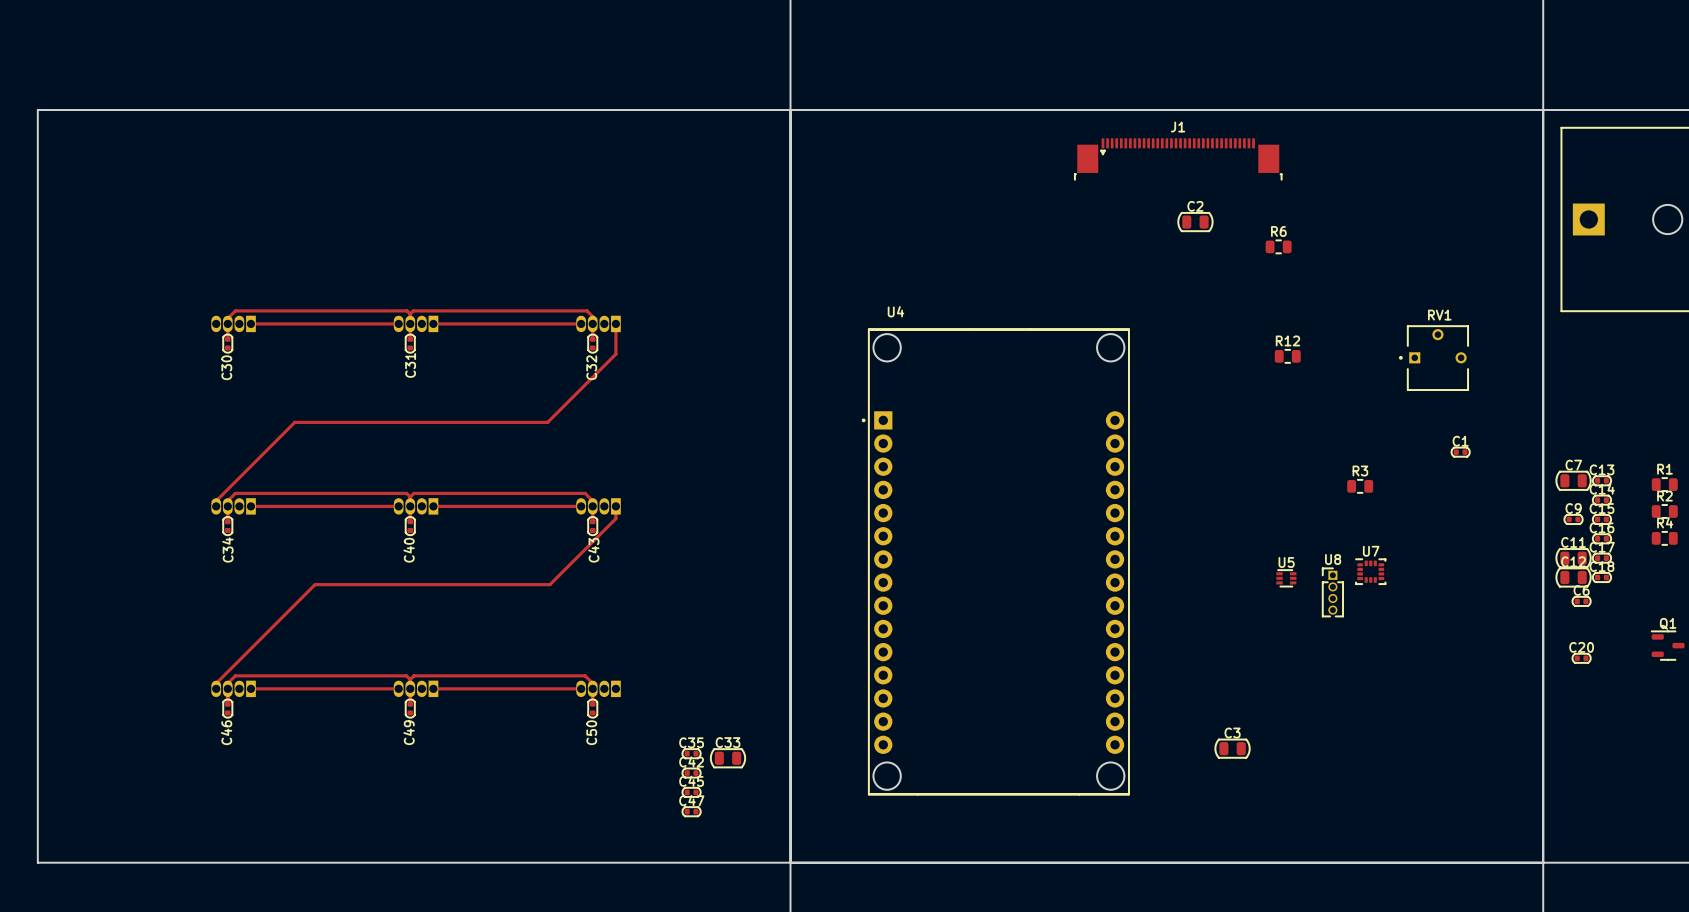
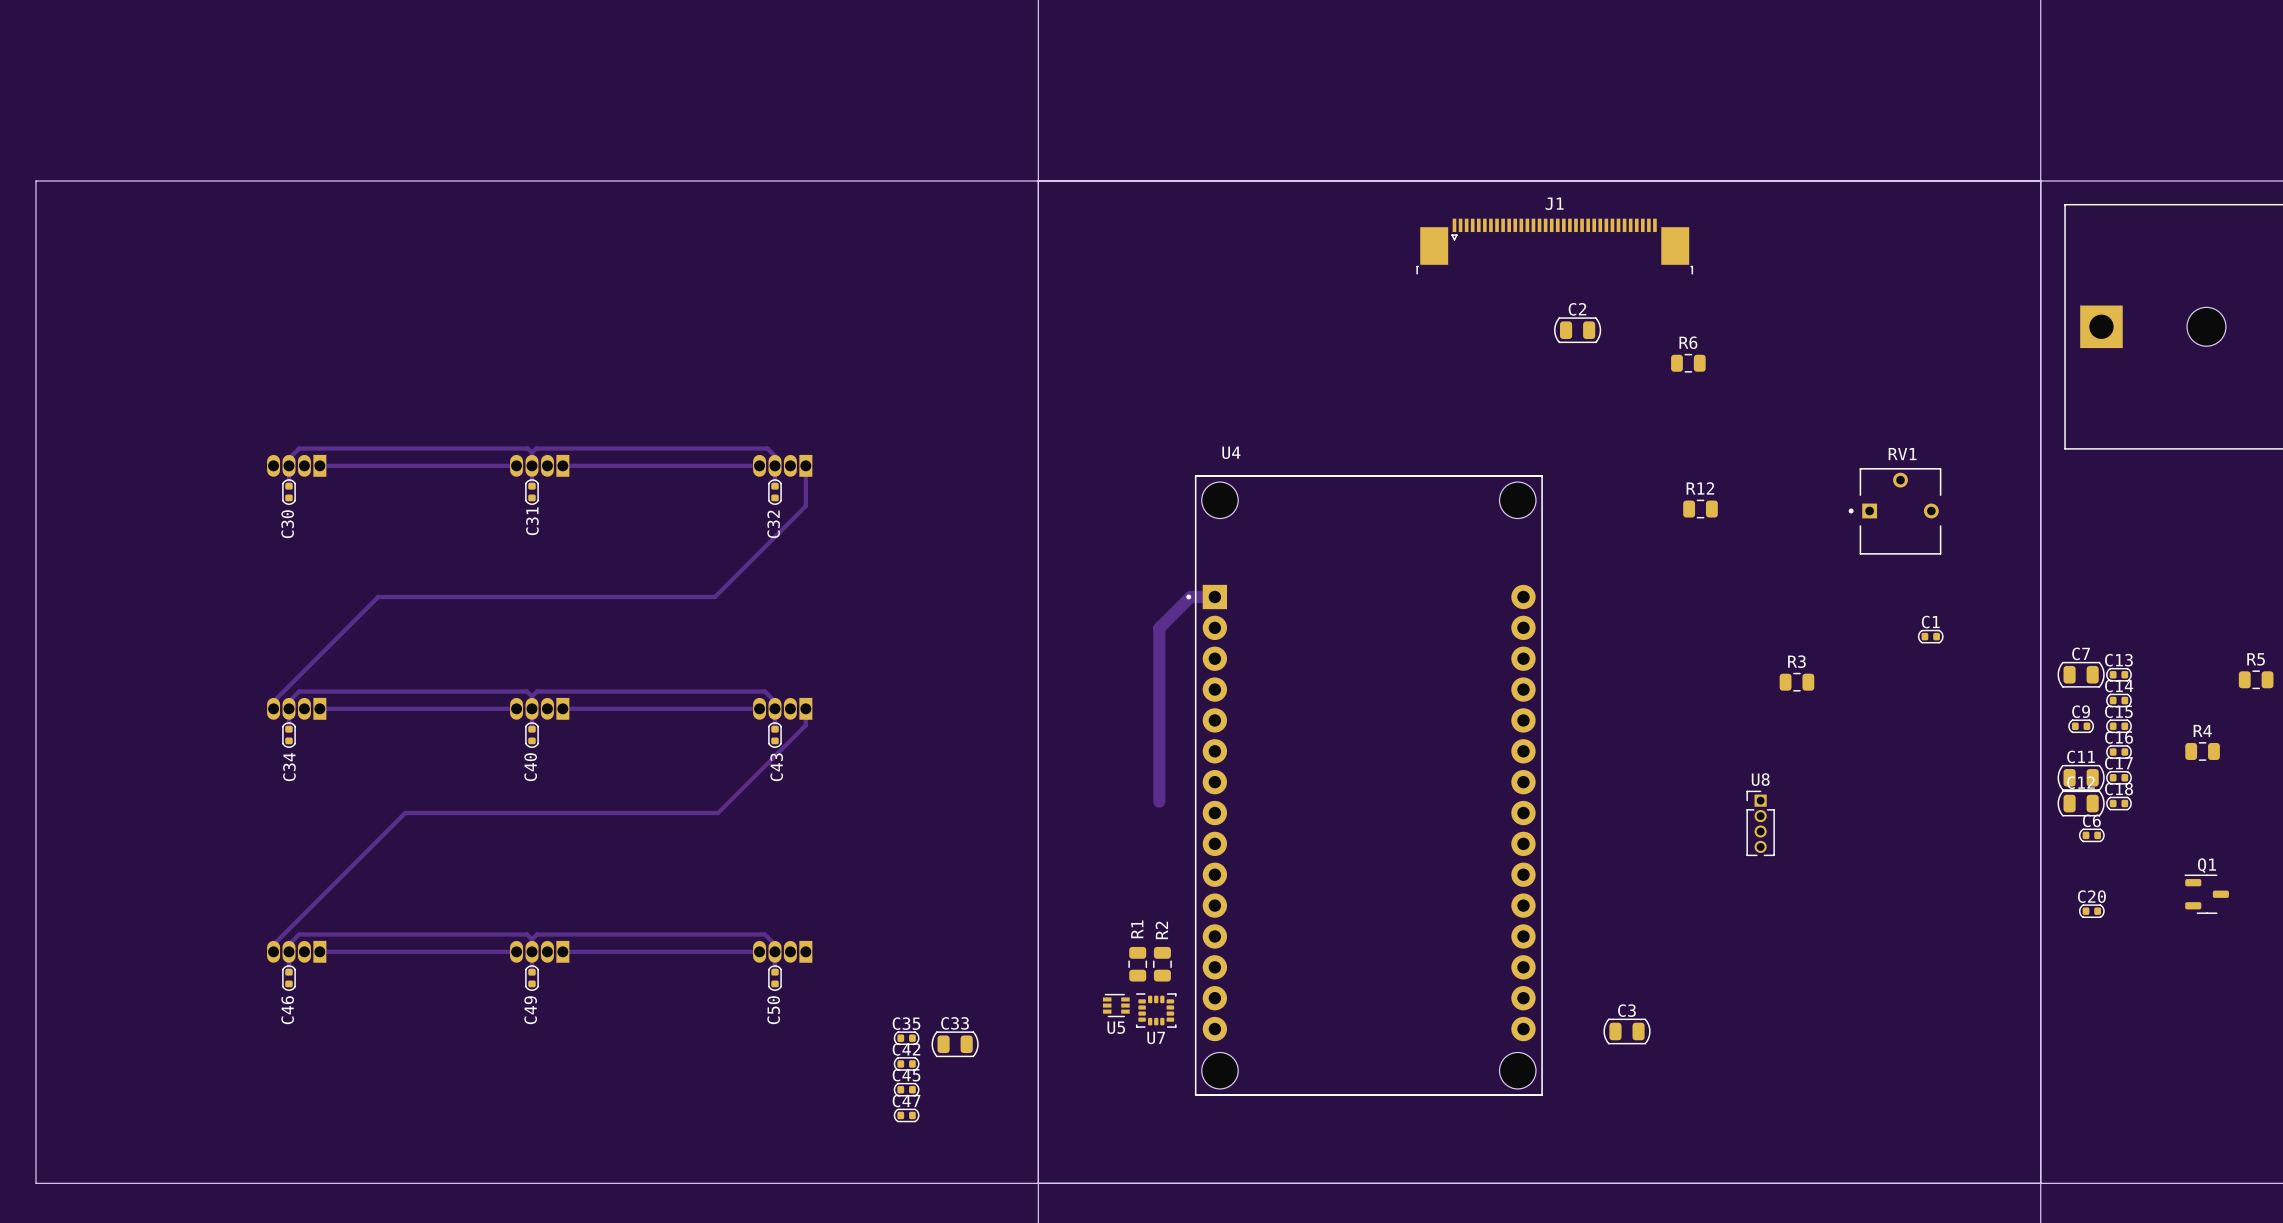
track: none -> (1214, 597) (1190, 597) (1159, 628) (1159, 801)
R1 rotation: 0° (1664, 484) -> 90° clockwise (1137, 964)
R1 position: (1664, 484) -> (1137, 964)
R2 rotation: 0° (1664, 511) -> 90° clockwise (1162, 964)
R2 position: (1664, 511) -> (1162, 964)
U7 name position: U7 (1371, 551) -> U7 (1156, 1037)
U4 position: (995, 561) -> (1364, 785)
U5 name position: U5 (1286, 562) -> U5 (1116, 1027)
U7 position: (1370, 571) -> (1156, 1010)
U5 position: (1286, 578) -> (1116, 1005)

